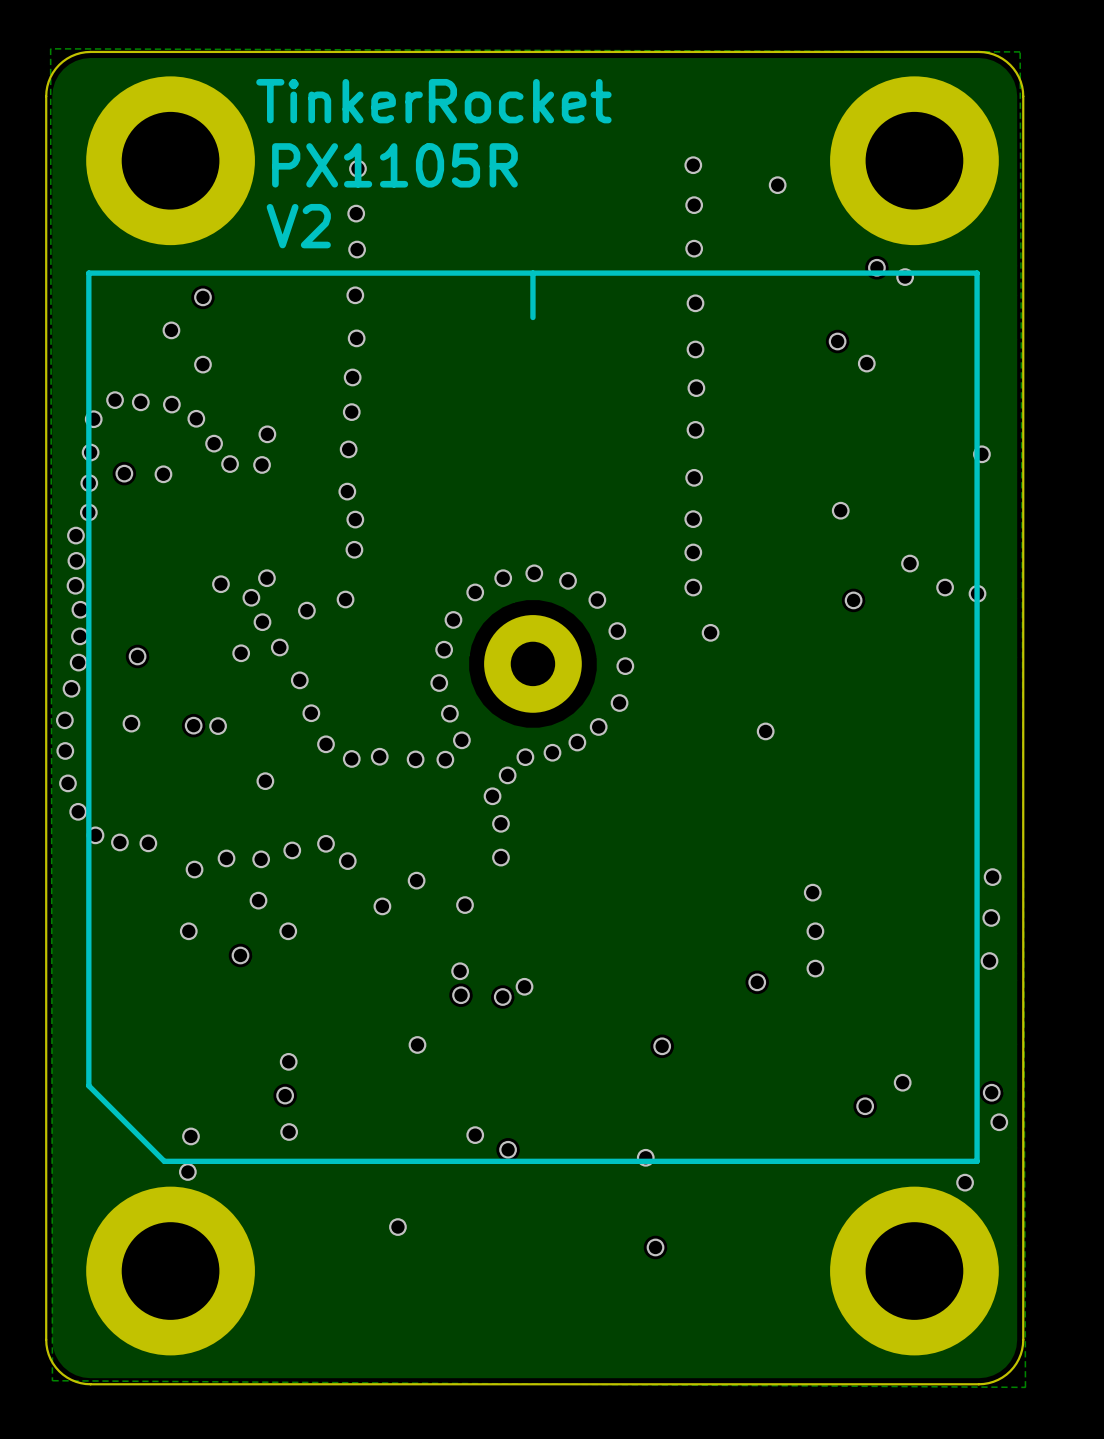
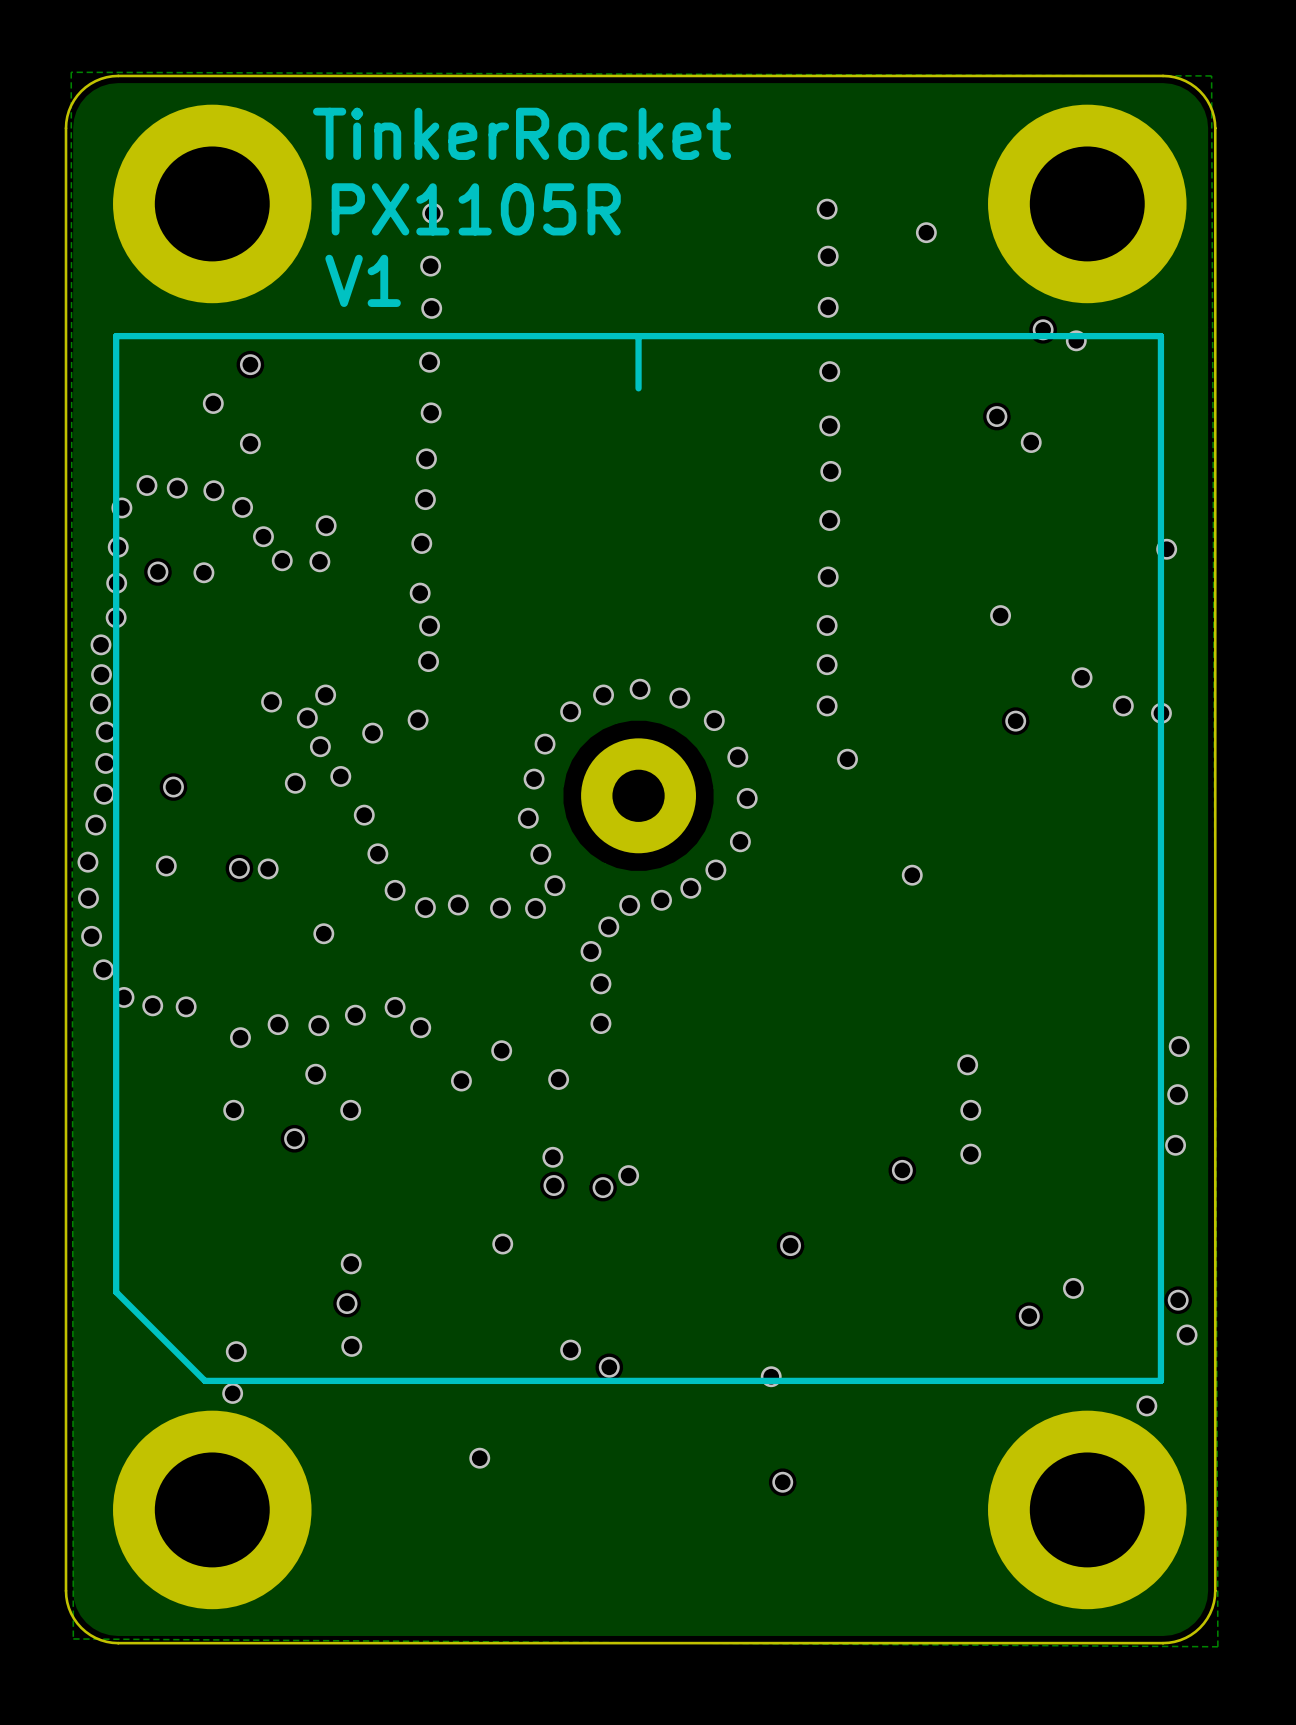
text: V2 (298, 226) -> V1 (363, 280)

